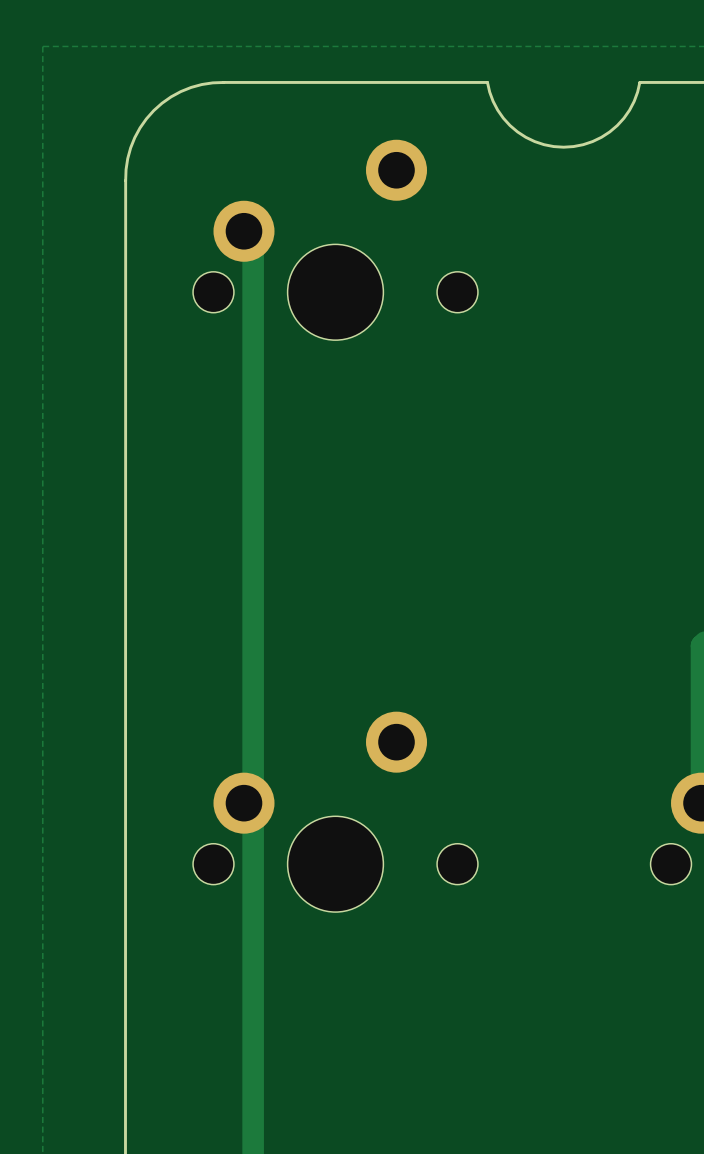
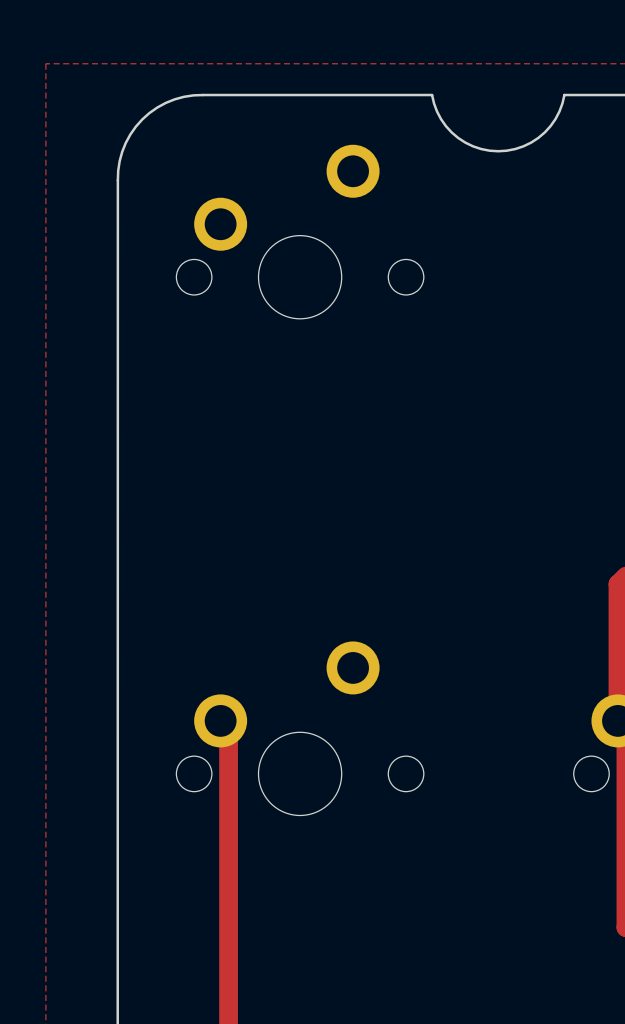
track: (243, 231) (253, 240) (253, 794) (243, 803) (256, 815) -> none

